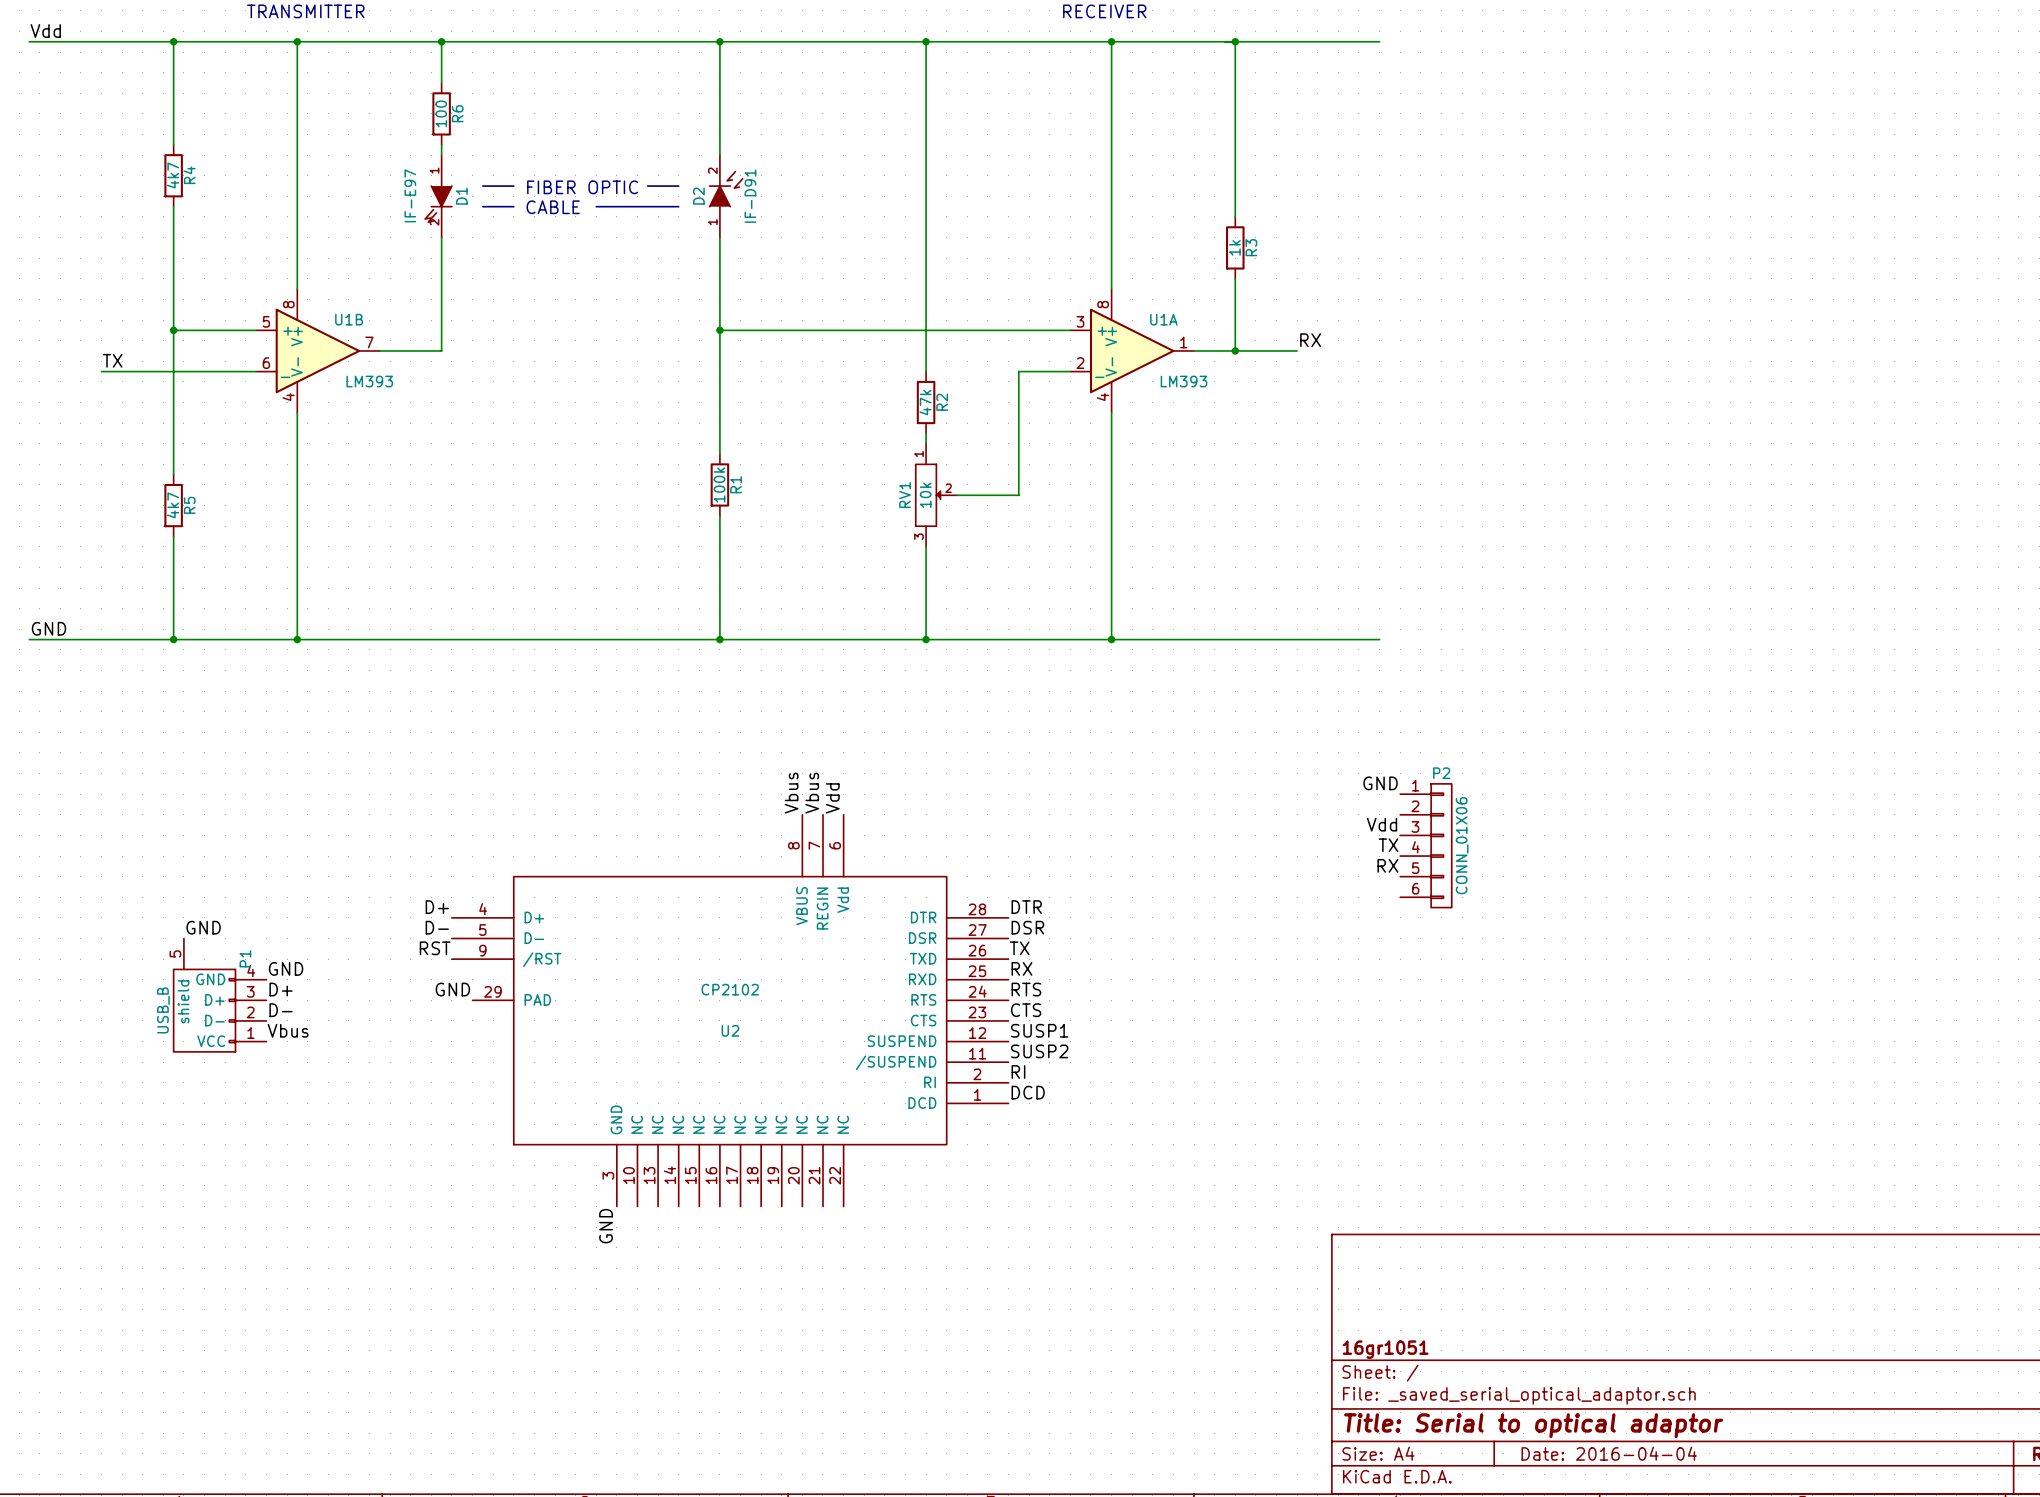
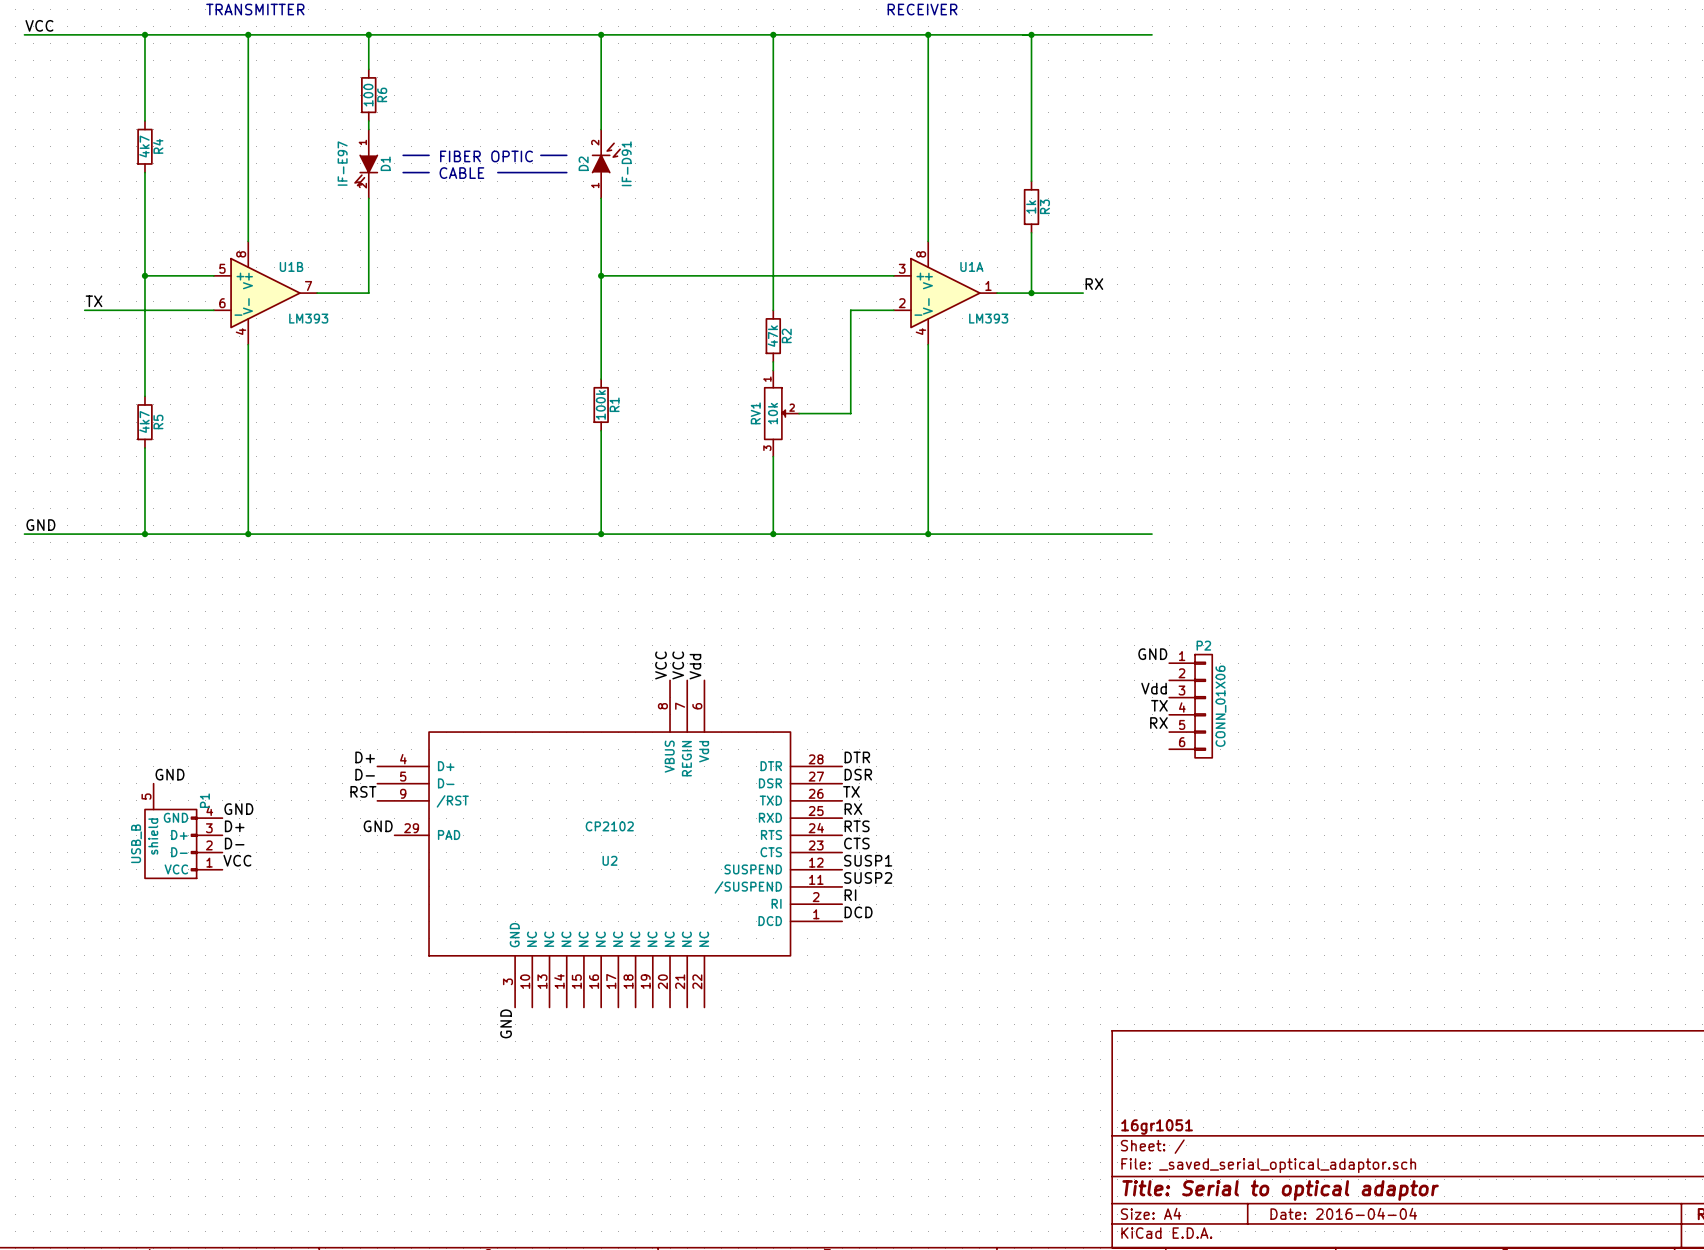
label: Vdd (45, 30) -> VCC (39, 25)
label: Vbus (791, 793) -> VCC (661, 665)
label: Vbus (812, 793) -> VCC (678, 665)
label: Vbus (288, 1030) -> VCC (237, 860)

